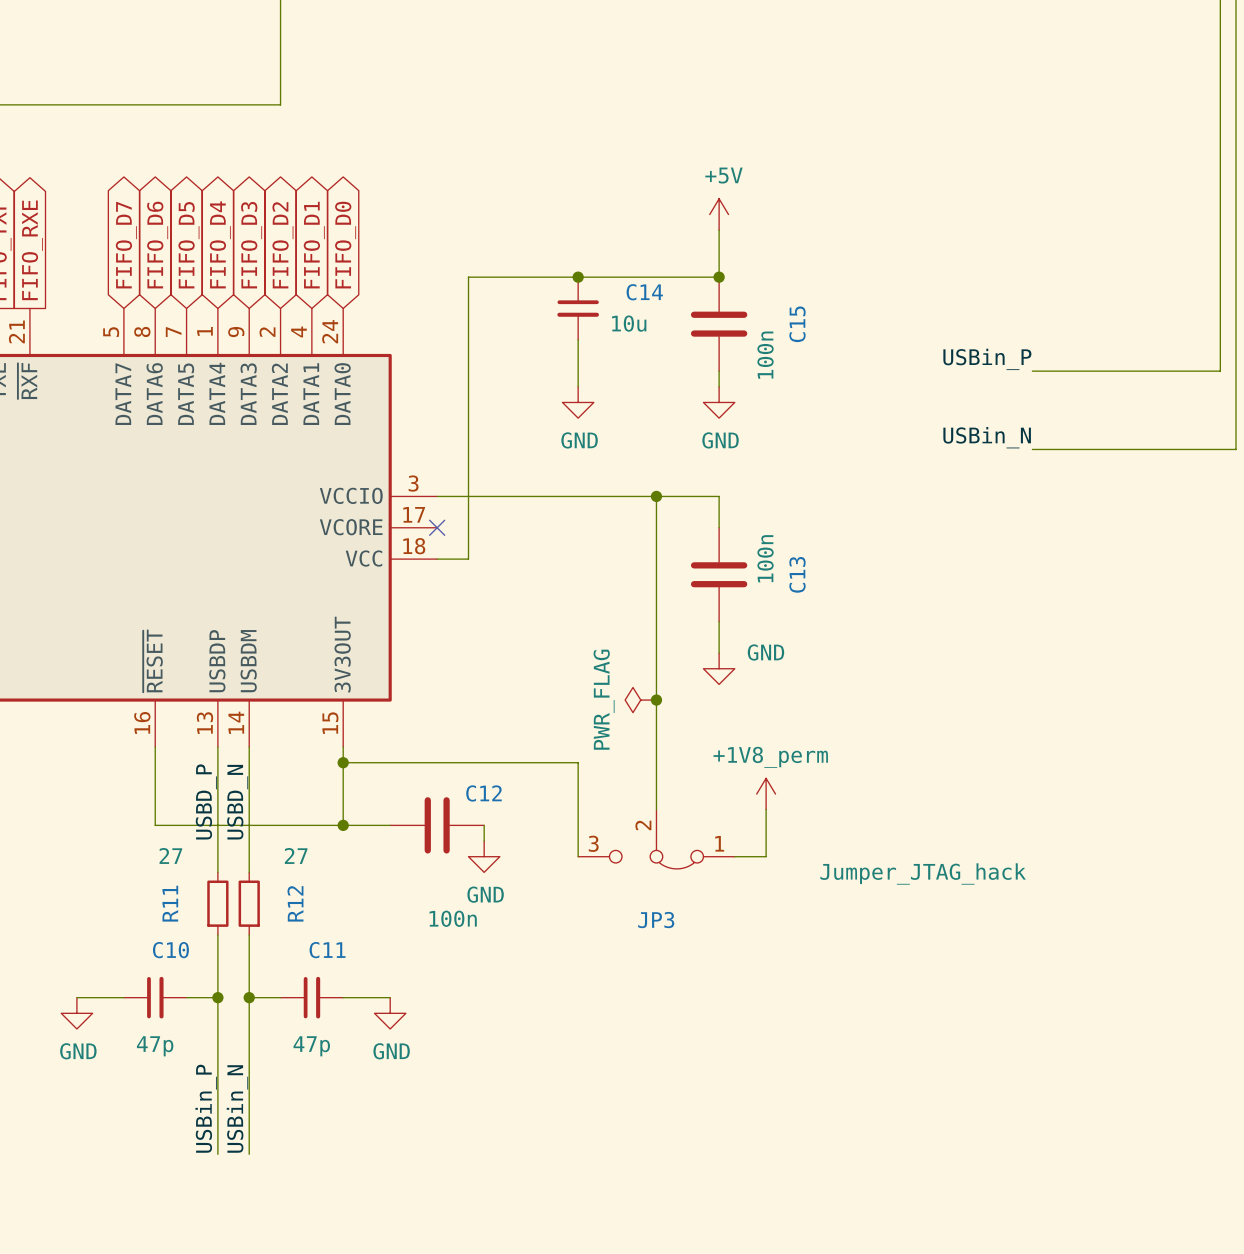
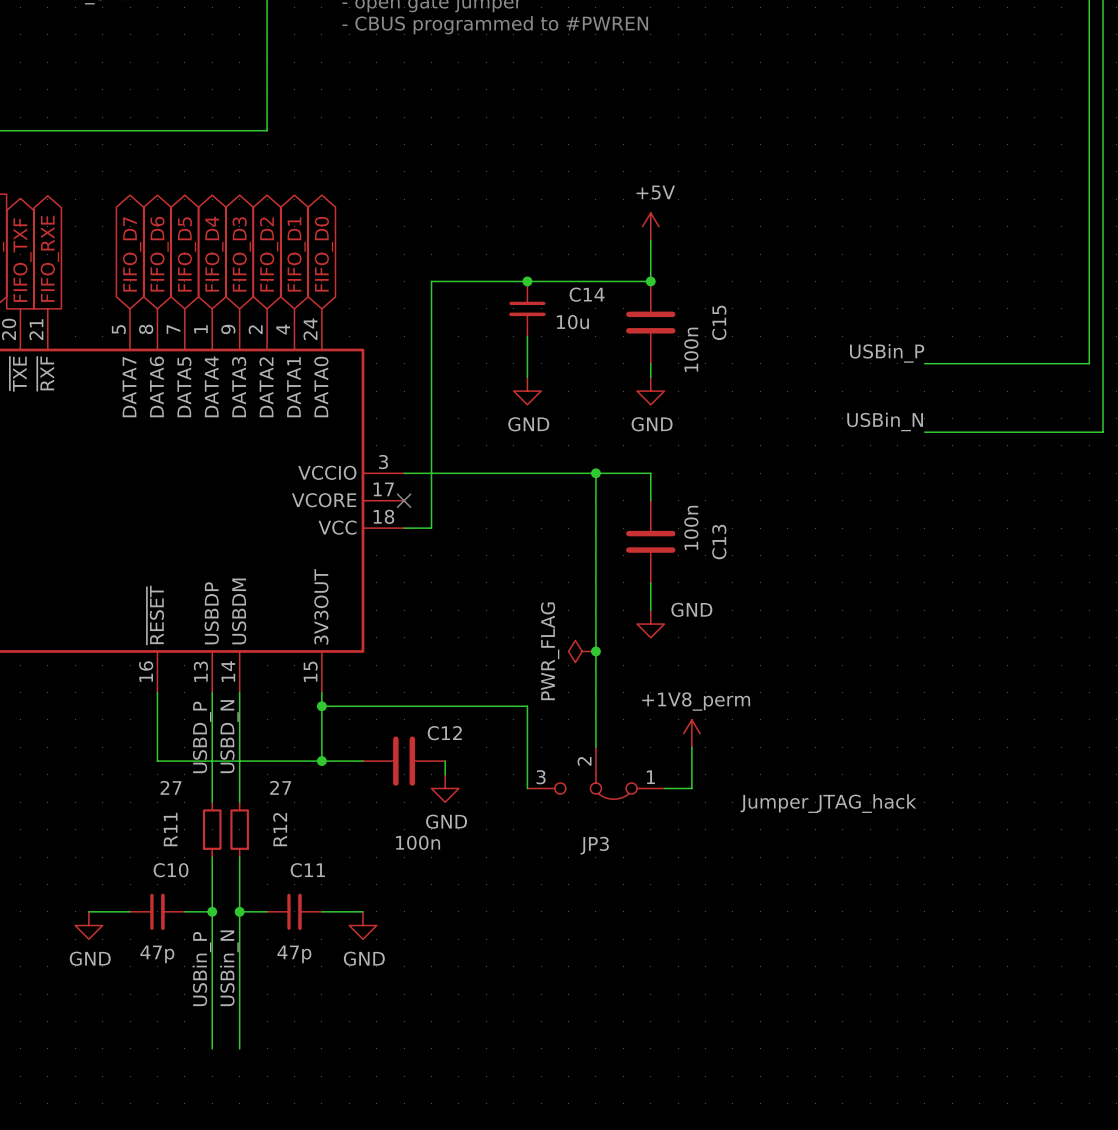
label position: USBin_P (206, 1108) -> USBin_P (201, 969)
label position: USBin_N (237, 1108) -> USBin_N (229, 968)

